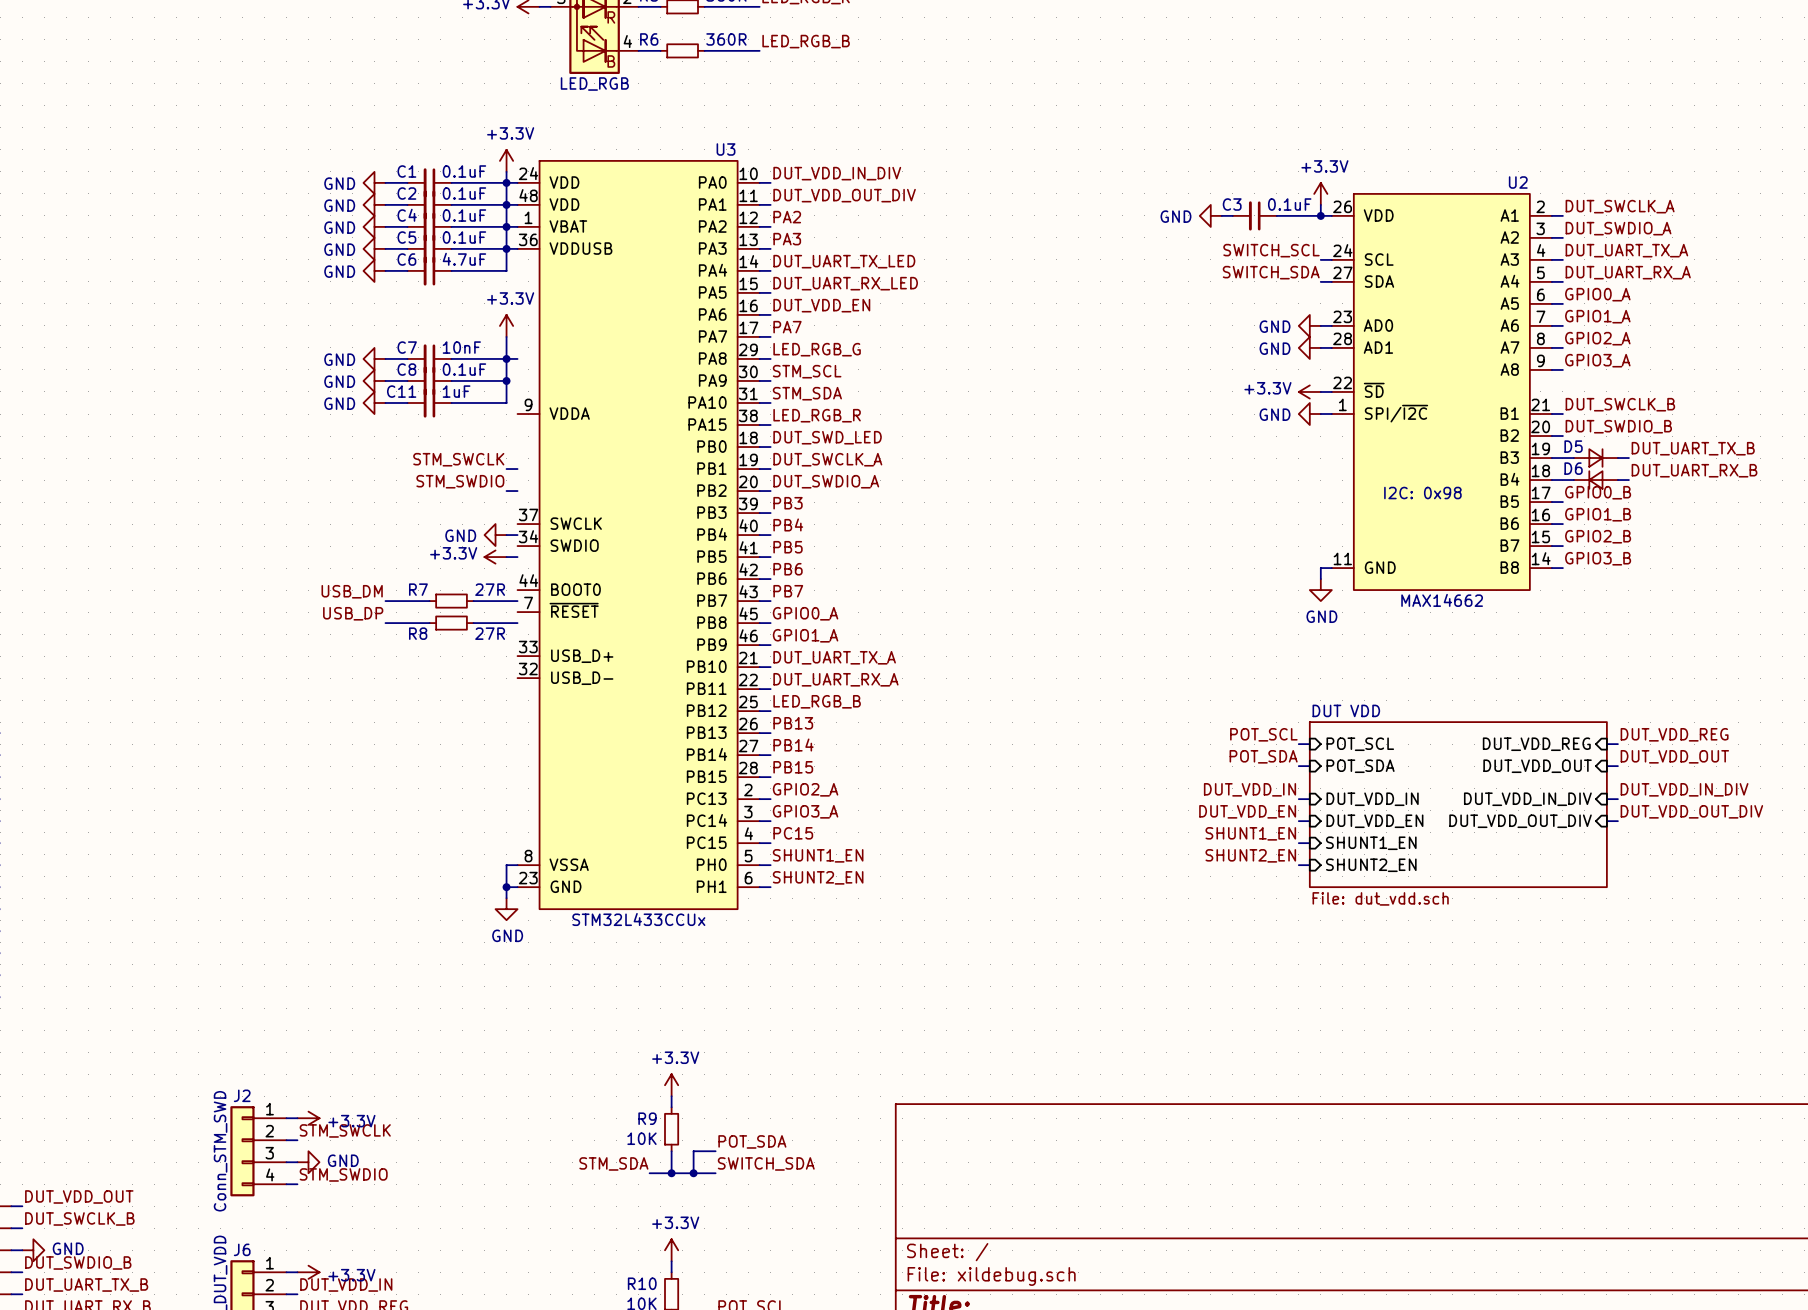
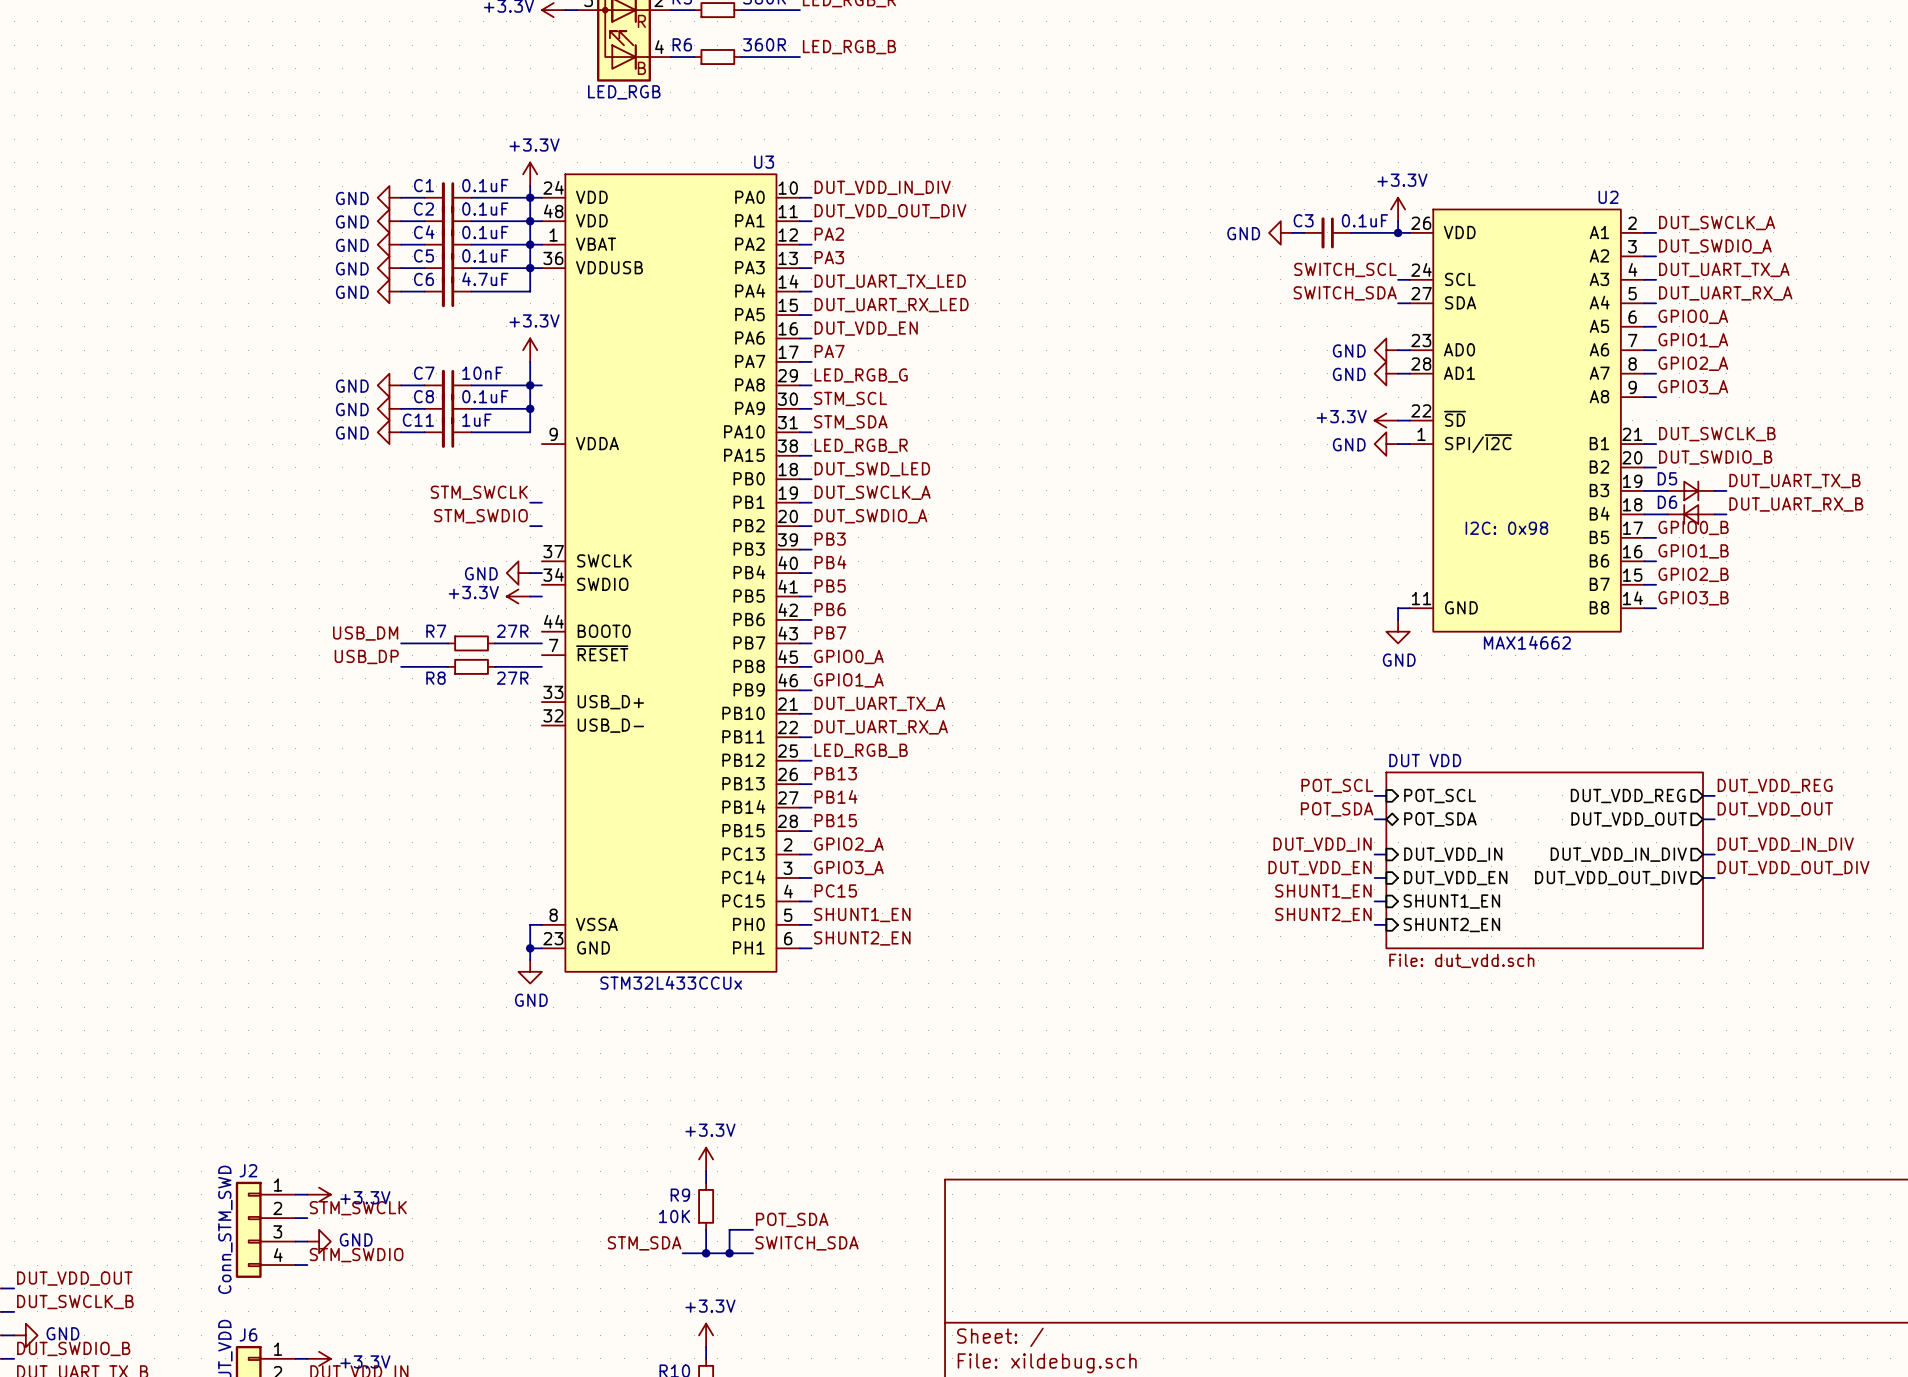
sheet pin shape: input (1536, 744) -> output (1628, 796)
sheet pin shape: input (1360, 766) -> bidirectional (1440, 819)
sheet pin shape: input (1537, 766) -> output (1629, 819)
sheet pin shape: input (1527, 799) -> output (1618, 854)
sheet pin shape: input (1520, 821) -> output (1610, 878)

